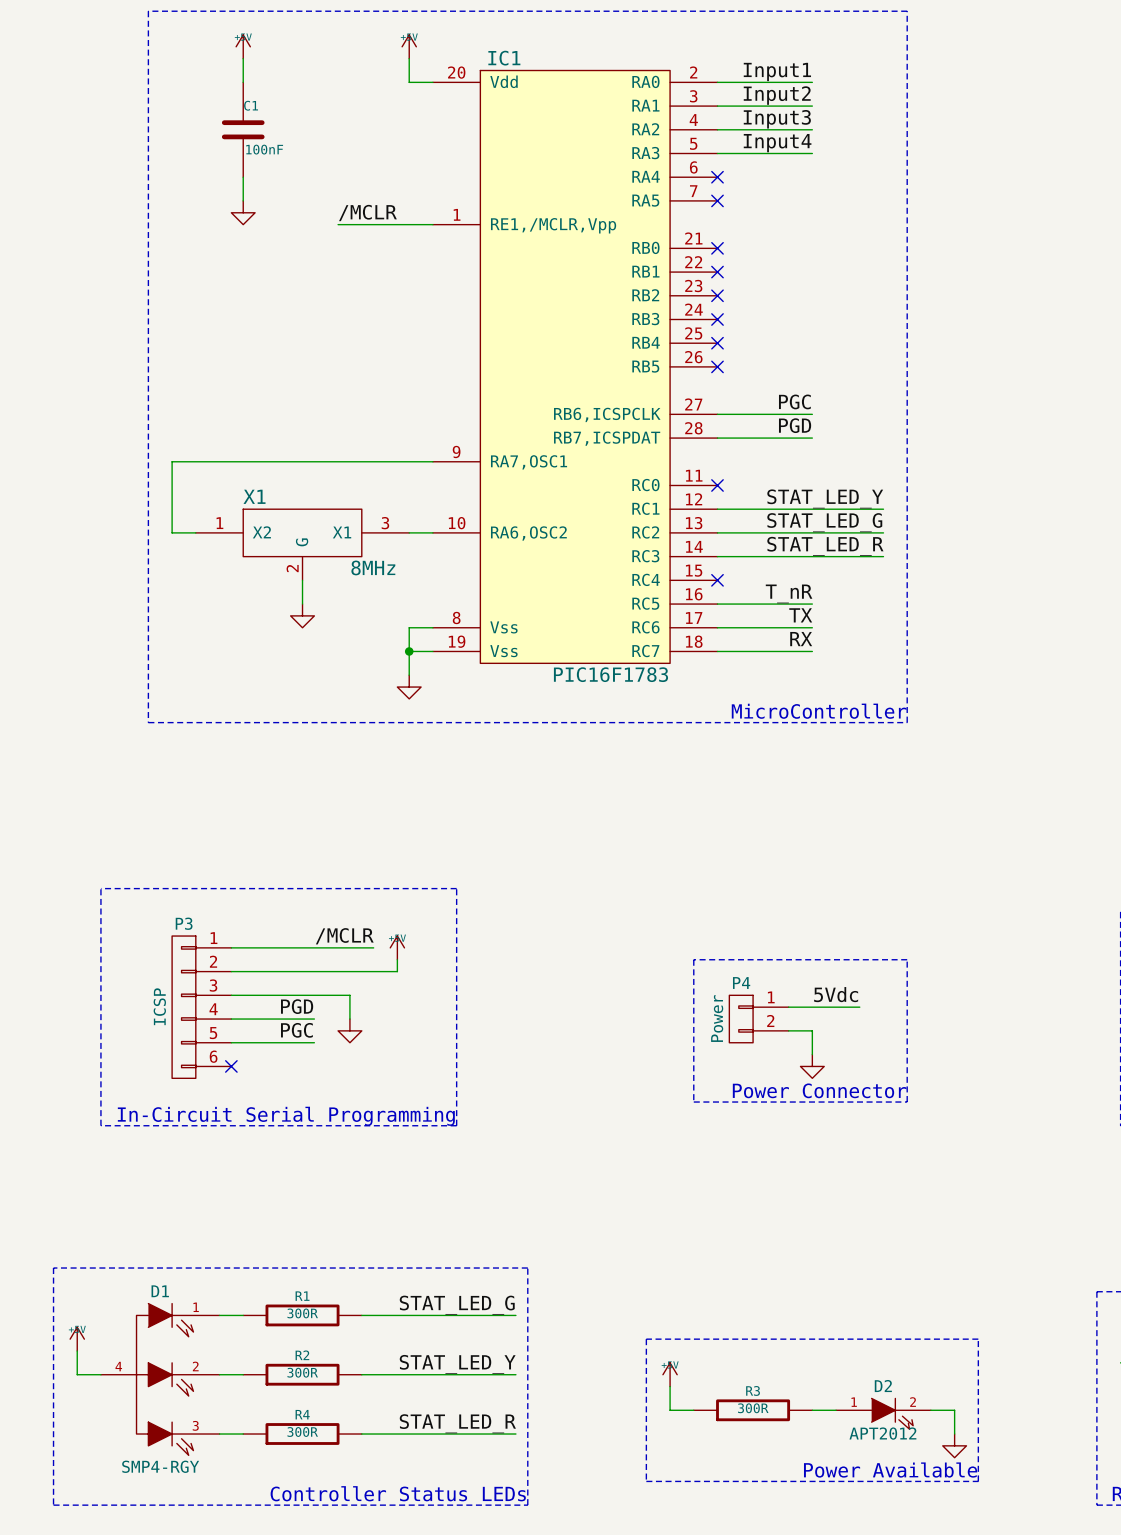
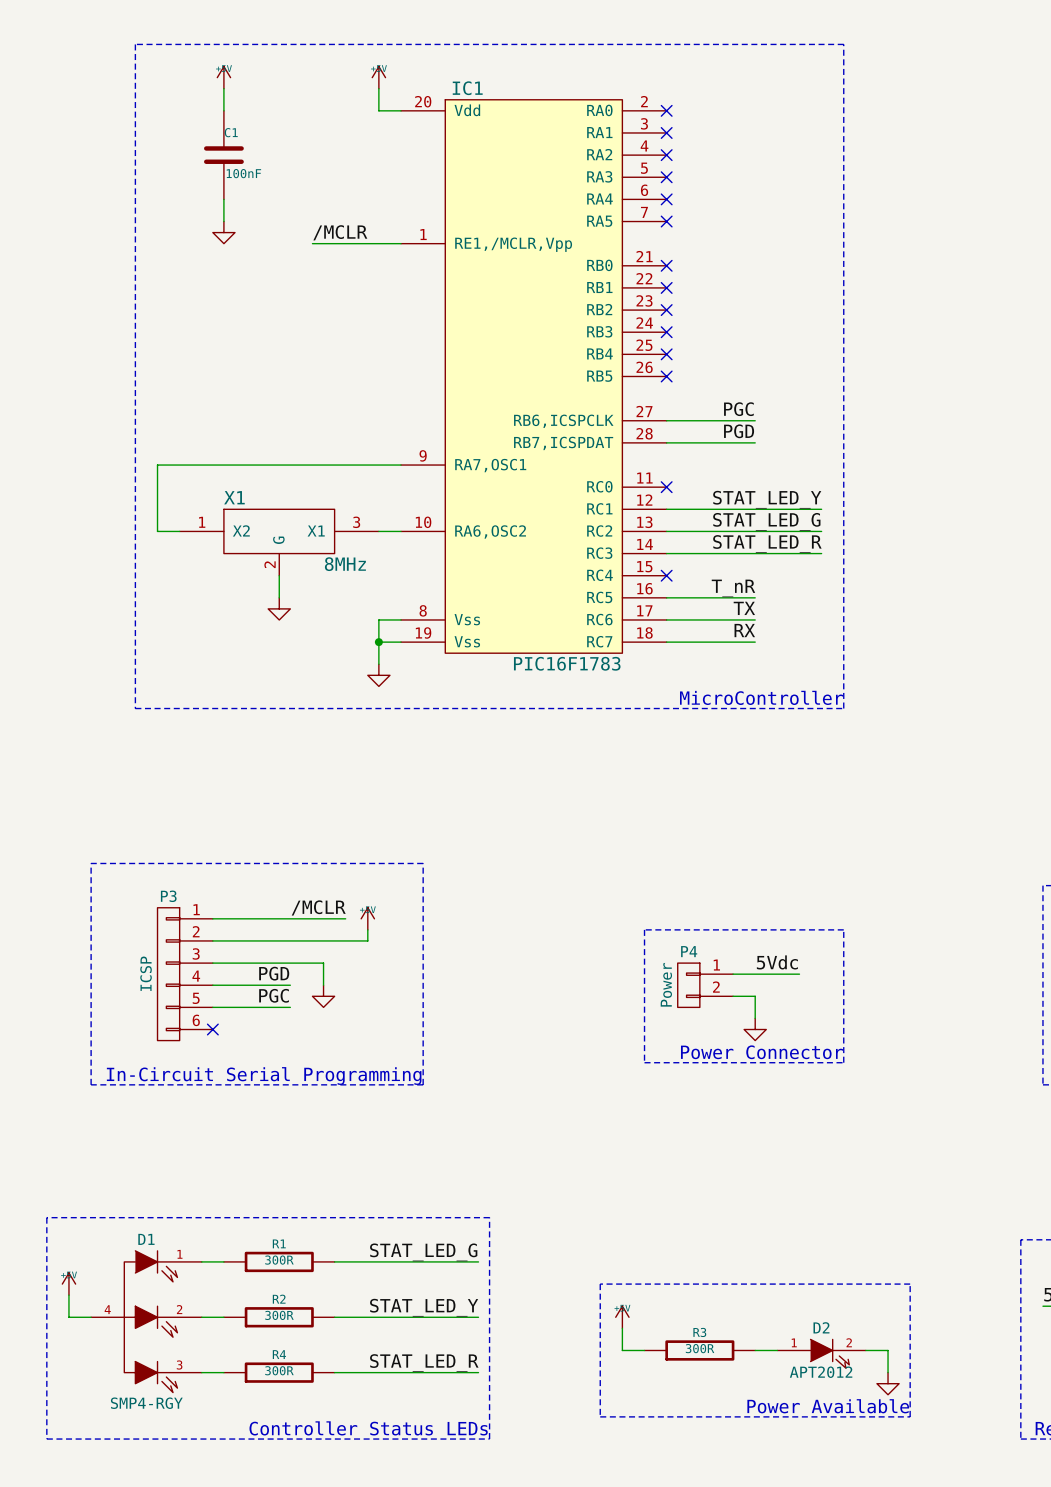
label: Input1 (777, 71) -> none
wire: (717, 82) (812, 82) -> none
no-connect mark: none -> (666, 110)
label: Input2 (777, 95) -> none
wire: (717, 106) (812, 106) -> none
no-connect mark: none -> (666, 132)
label: Input3 (777, 119) -> none
wire: (717, 129) (812, 129) -> none
no-connect mark: none -> (666, 155)
label: Input4 (777, 143) -> none
wire: (717, 153) (812, 153) -> none
no-connect mark: none -> (666, 177)

